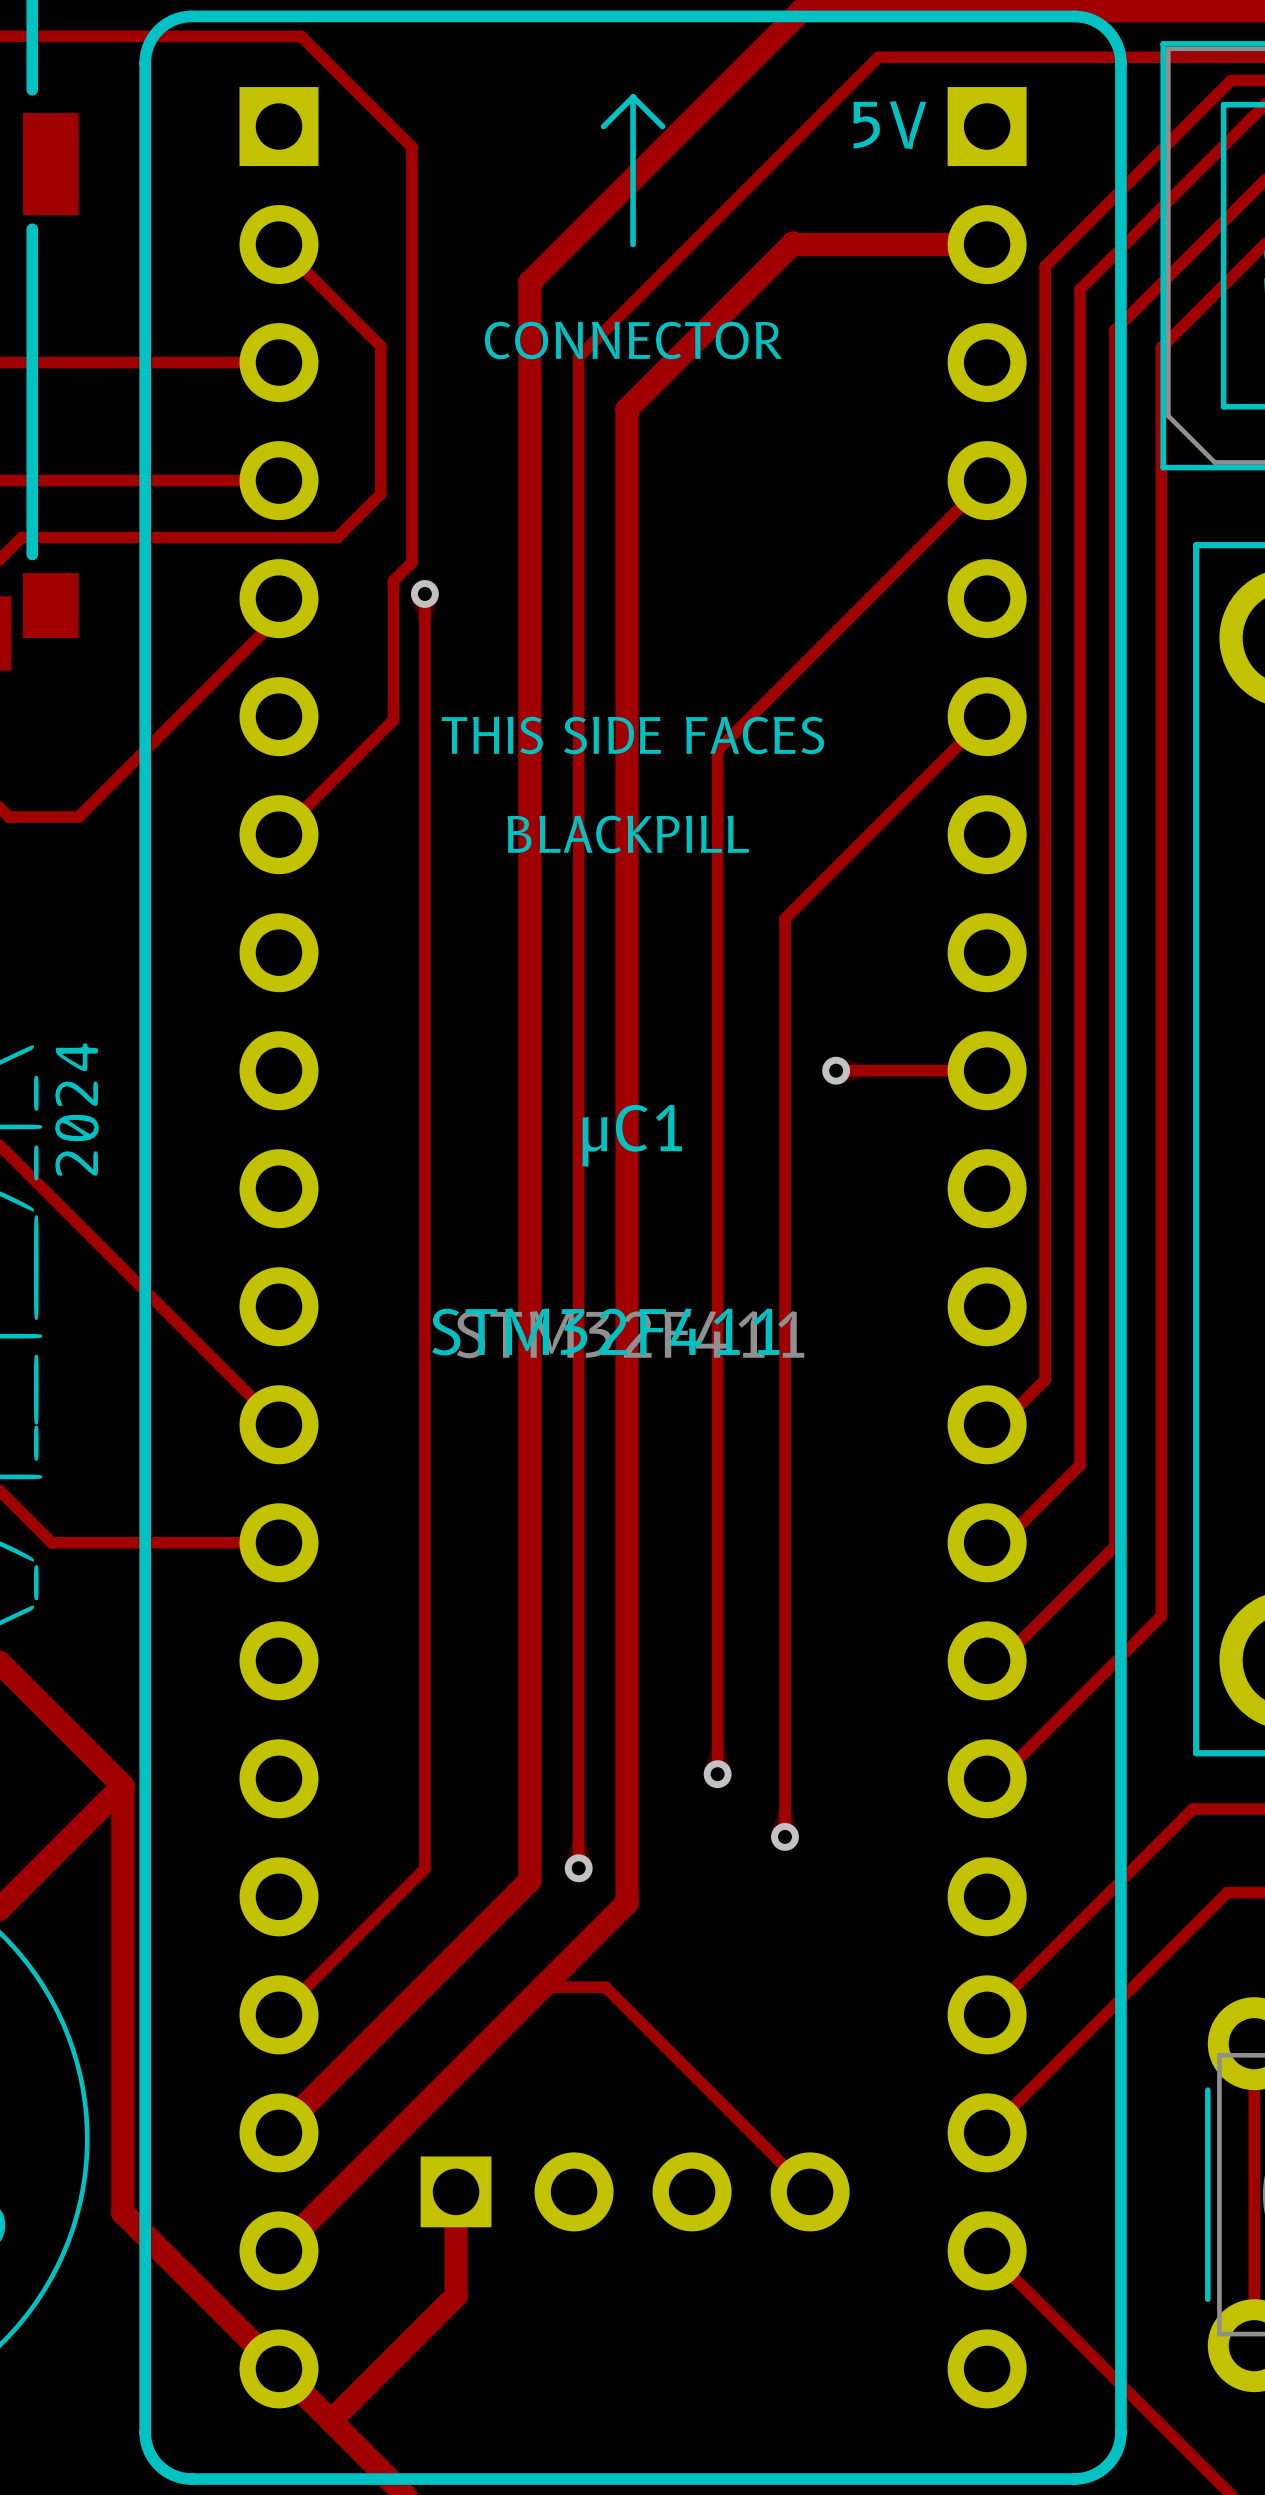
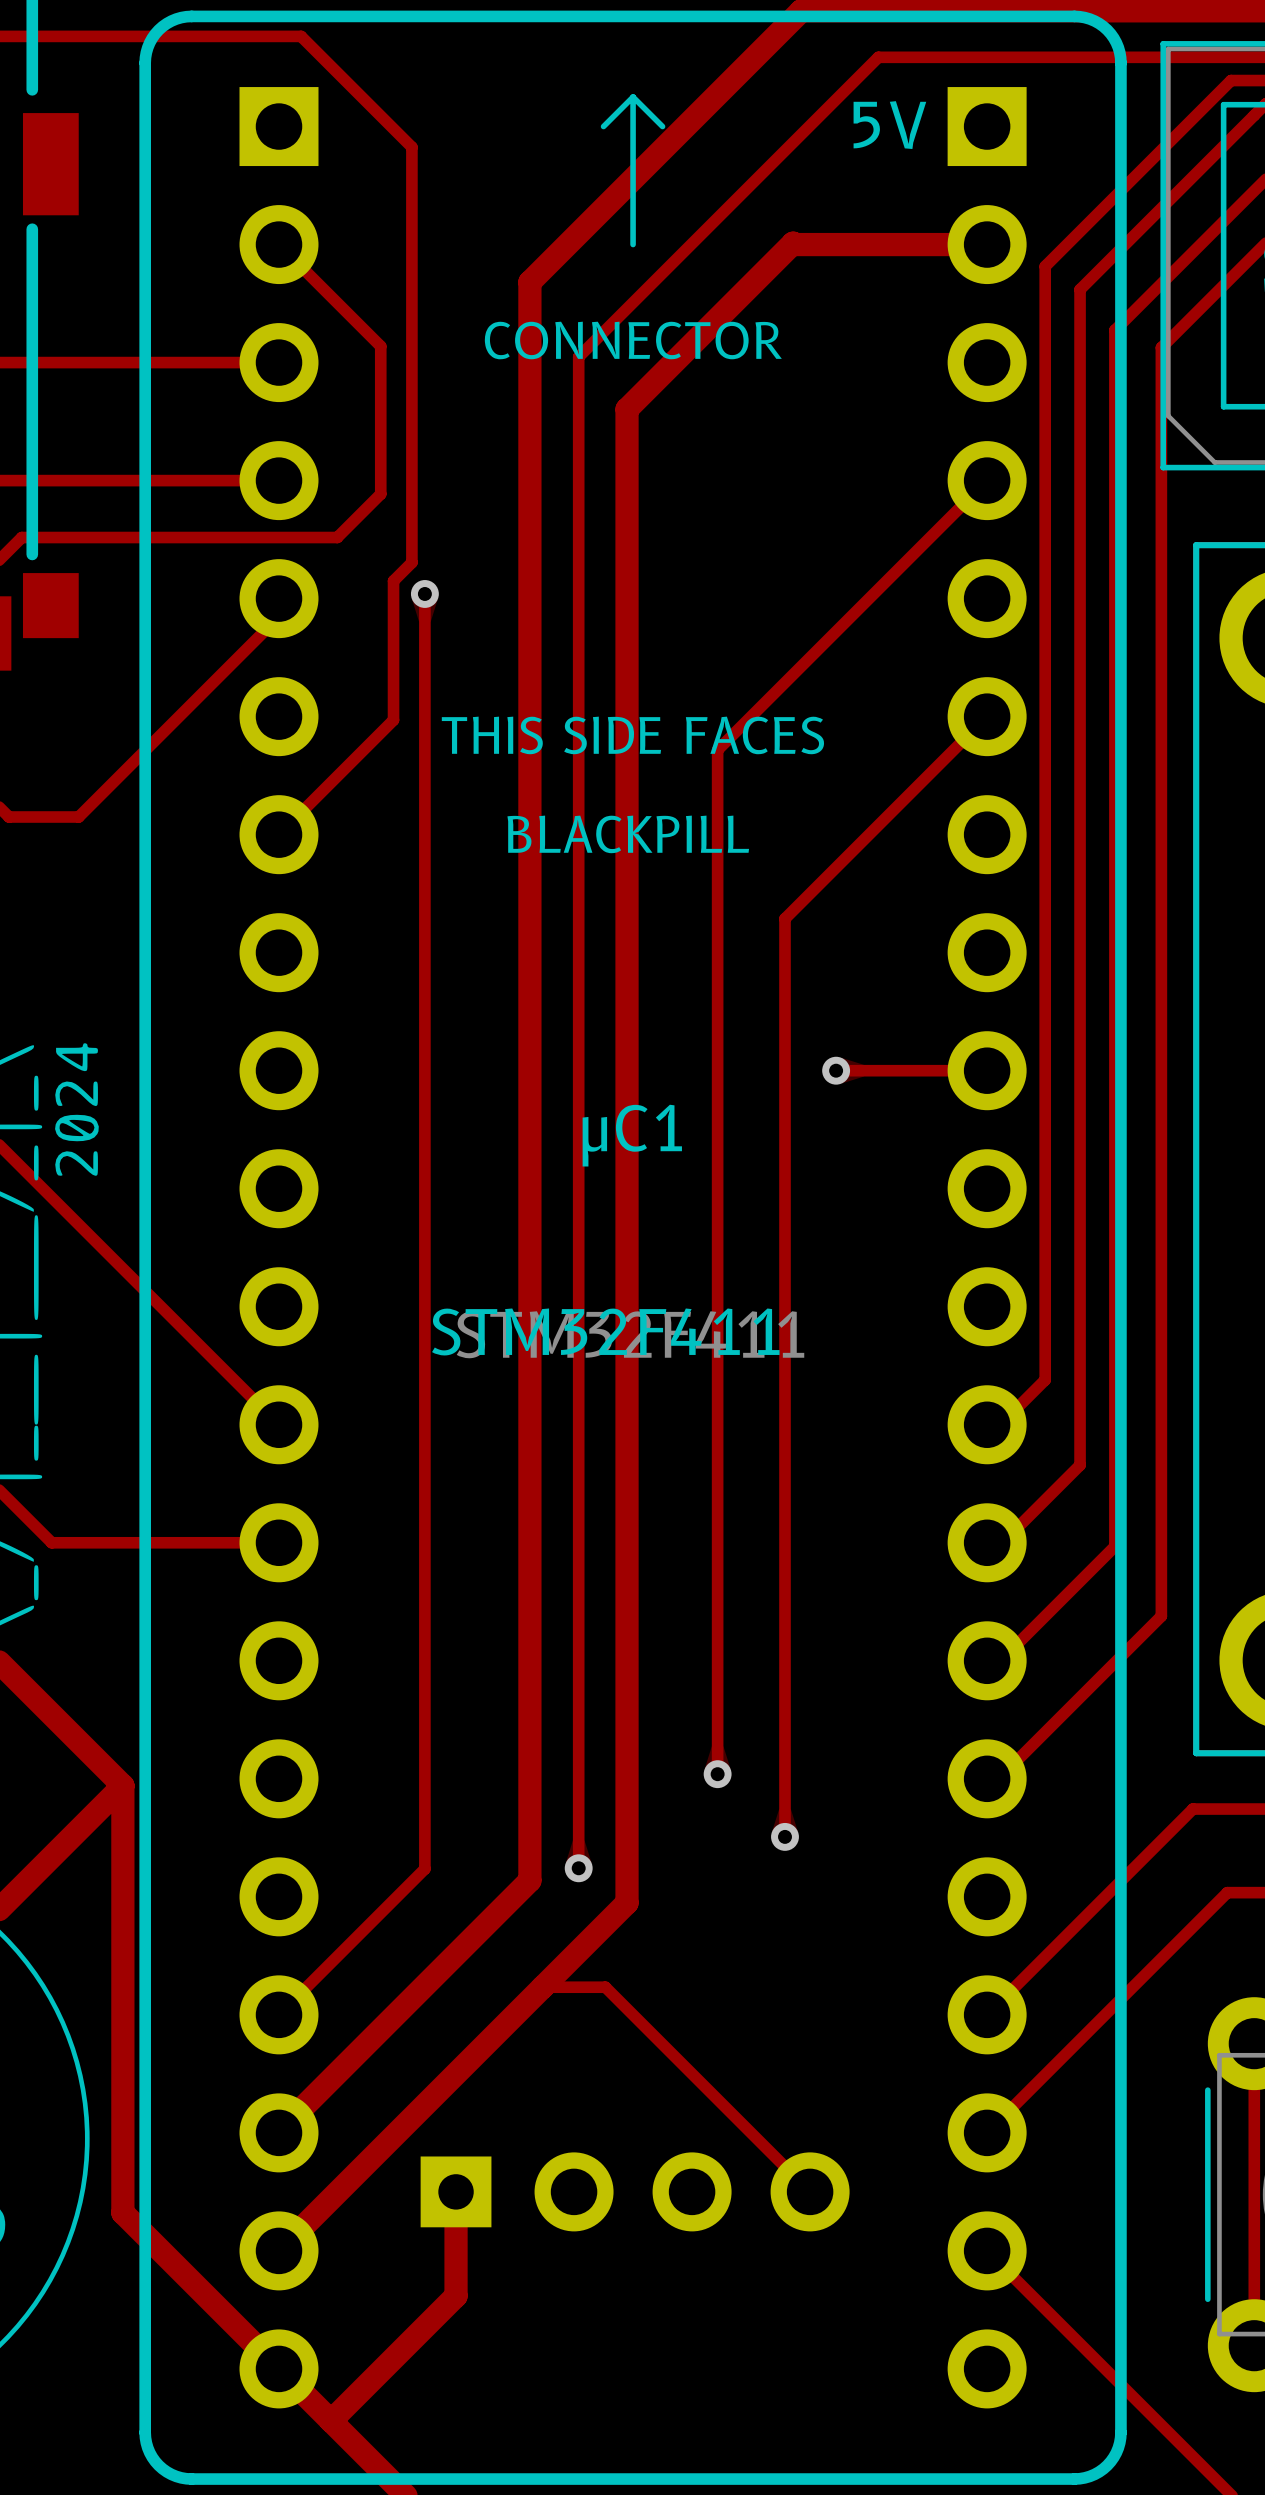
μC1 footprint: [139, 10, 1127, 2485] -> [139, 10, 1127, 2485]

